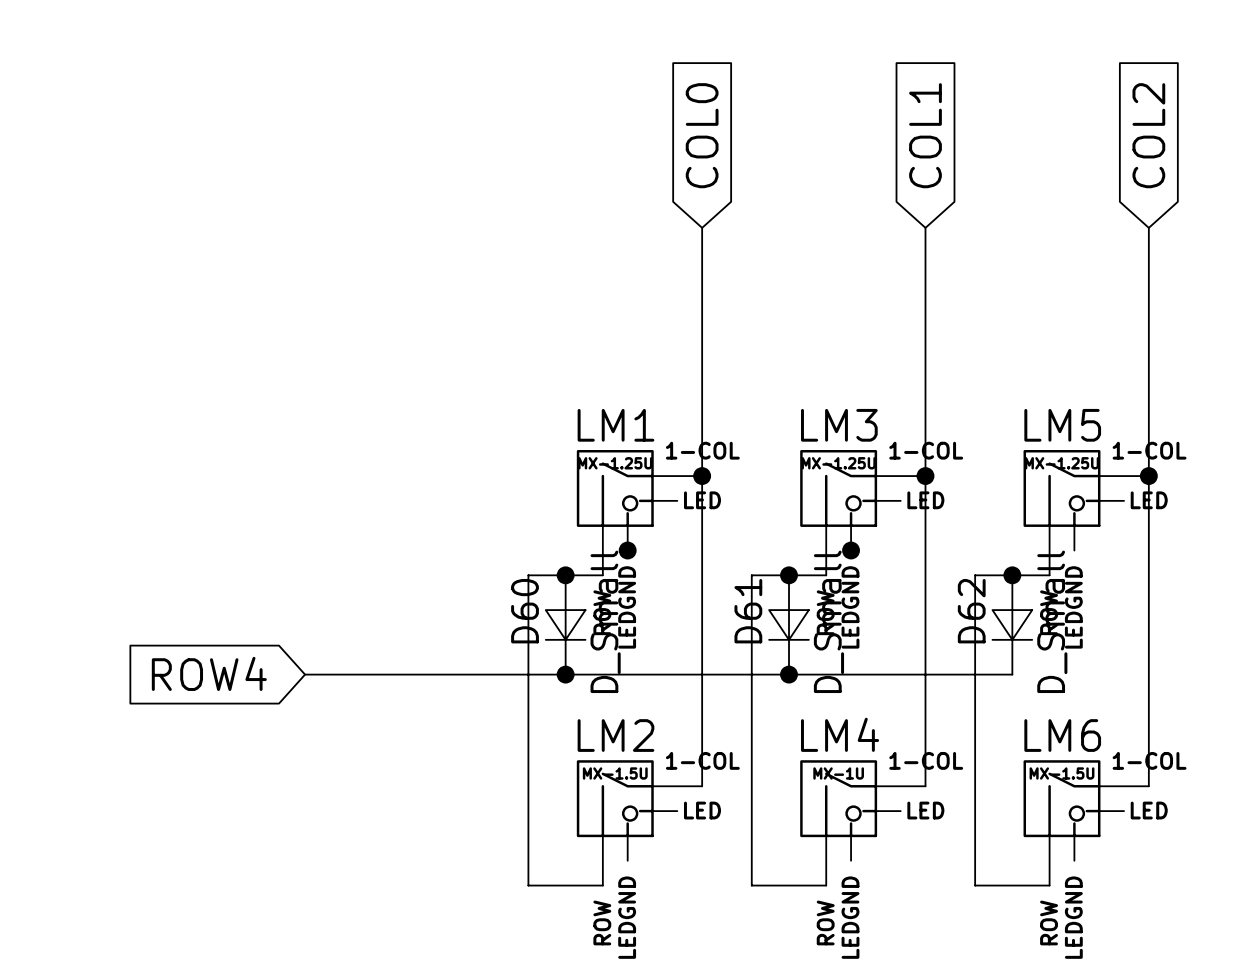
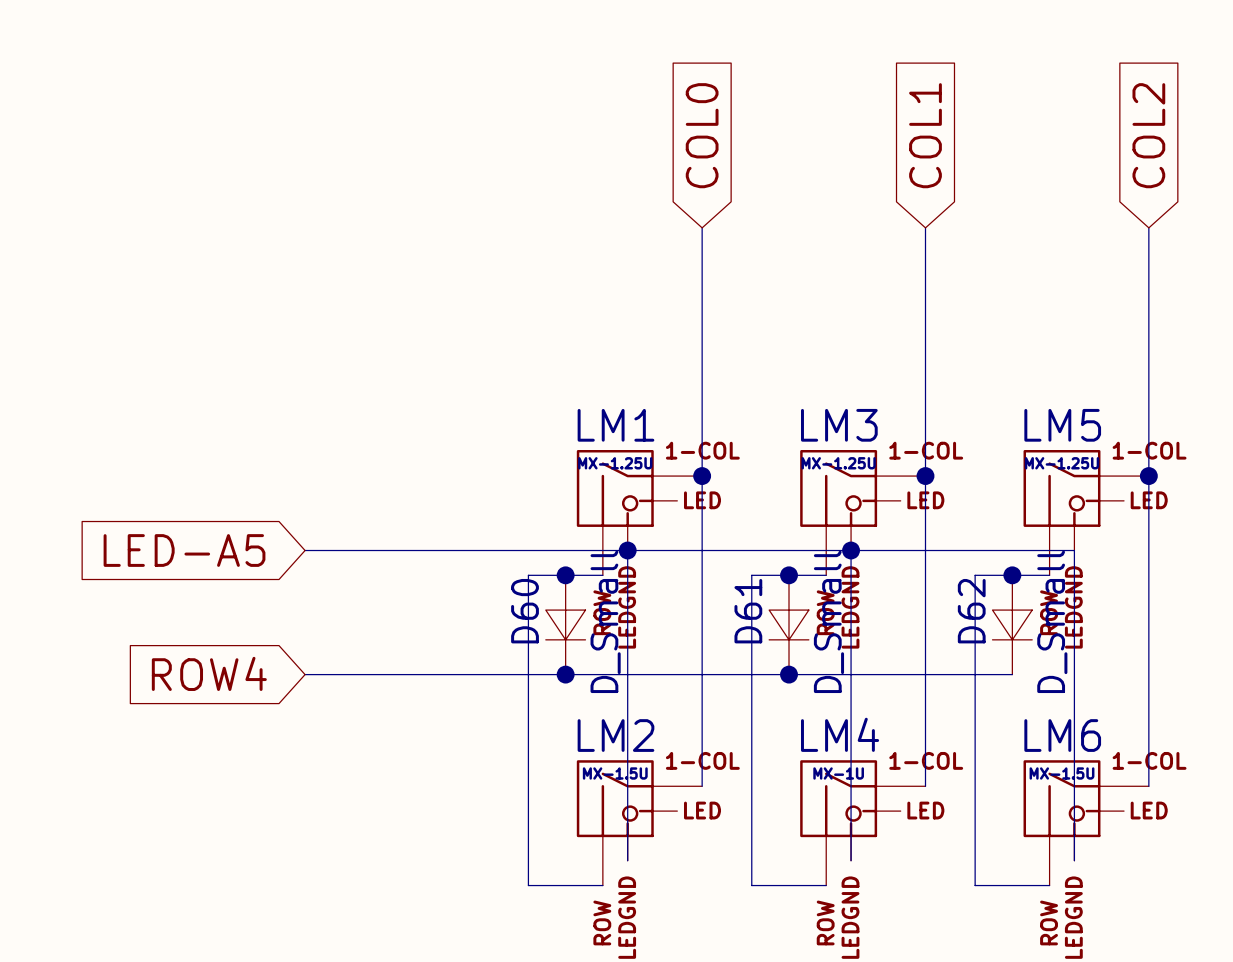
global label: none -> LED-A5 (184, 550)
wire: none -> (305, 550) (1074, 550) (1074, 860)
wire: none -> (627, 550) (627, 860)
wire: none -> (851, 550) (851, 860)

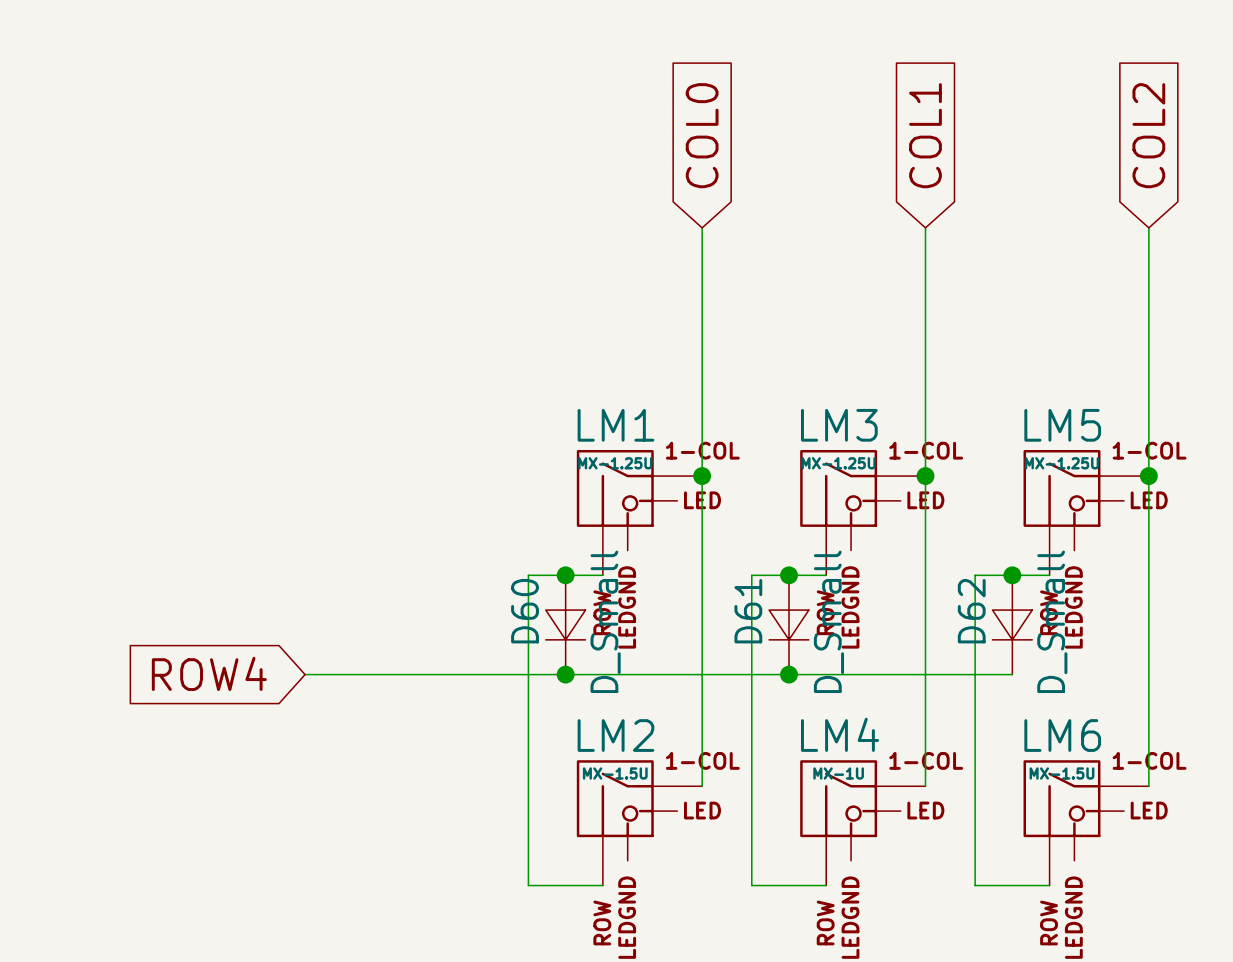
global label: LED-A5 (184, 550) -> none
wire: (305, 550) (1074, 550) (1074, 860) -> none
wire: (627, 550) (627, 860) -> none
junction: (627, 550) -> none
wire: (851, 550) (851, 860) -> none
junction: (851, 550) -> none

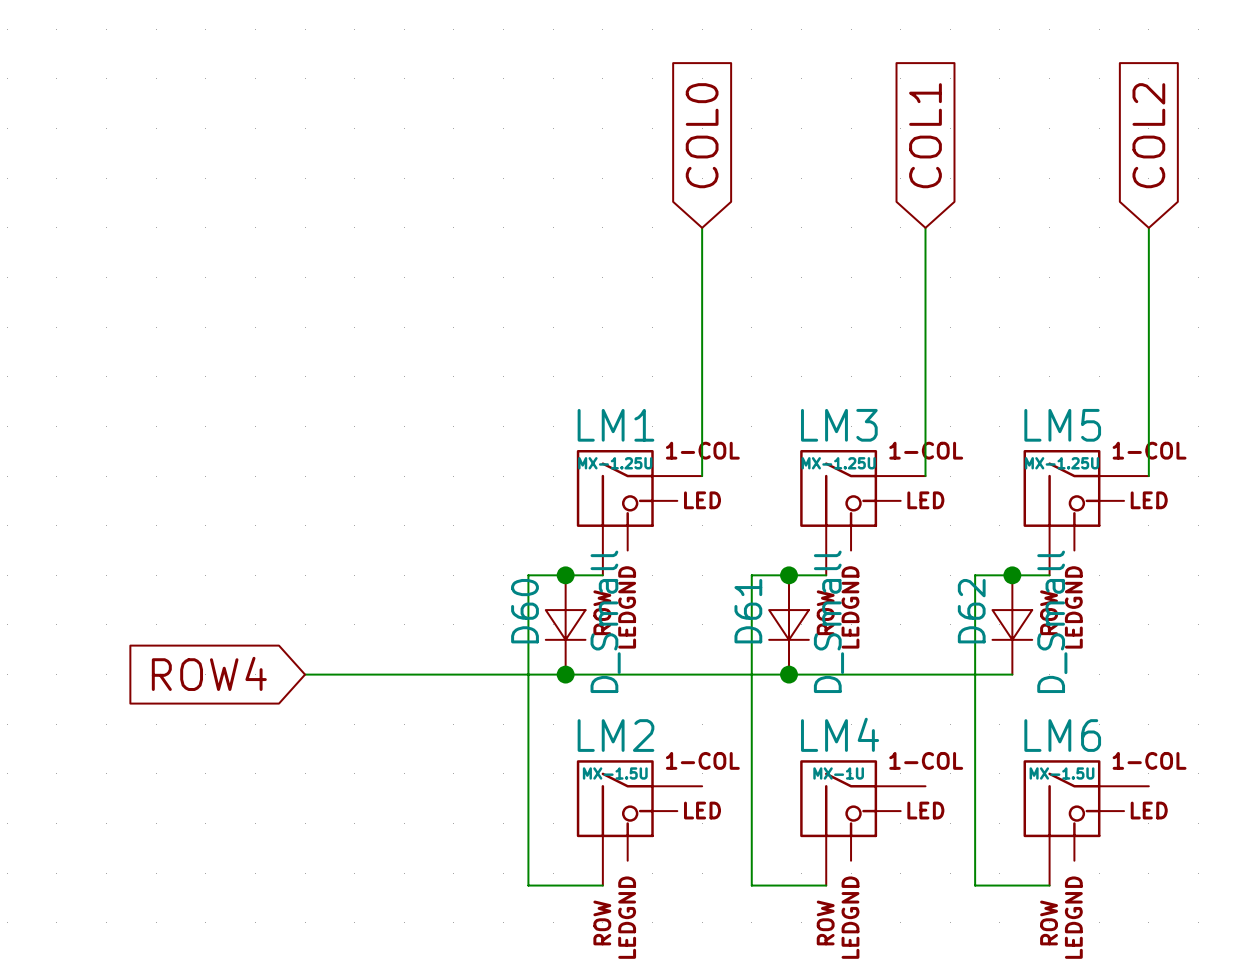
wire: (702, 476) (702, 786) -> none
junction: (702, 476) -> none
wire: (925, 476) (925, 786) -> none
junction: (925, 476) -> none
wire: (1148, 476) (1148, 786) -> none
junction: (1148, 476) -> none

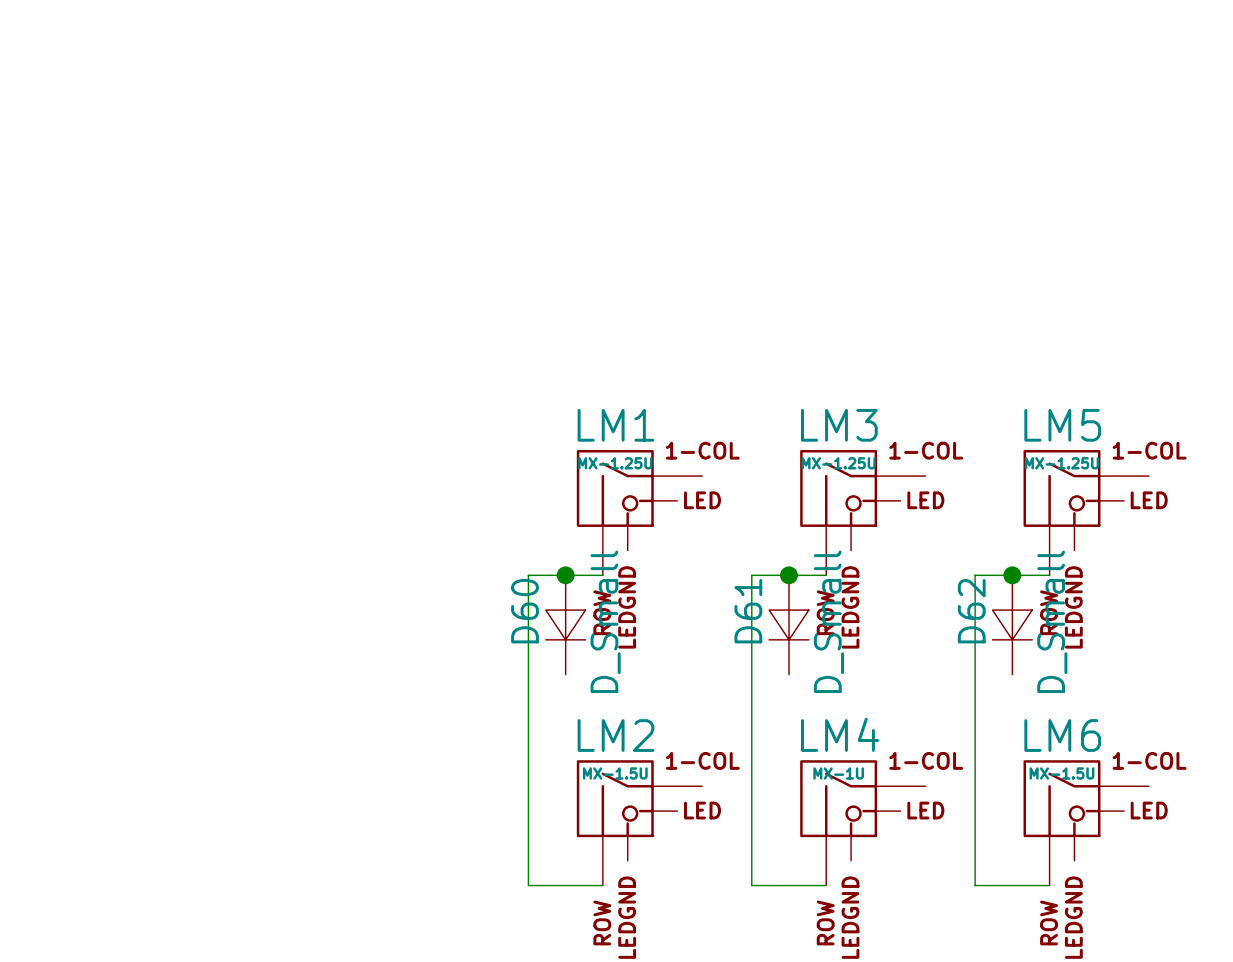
global label: COL0 (702, 135) -> none
global label: COL1 (925, 135) -> none
global label: COL2 (1148, 135) -> none
wire: (702, 227) (702, 476) -> none
wire: (925, 227) (925, 476) -> none
wire: (1148, 227) (1148, 476) -> none
global label: ROW4 (209, 673) -> none
wire: (305, 674) (1012, 674) -> none
junction: (565, 674) -> none
junction: (789, 674) -> none

